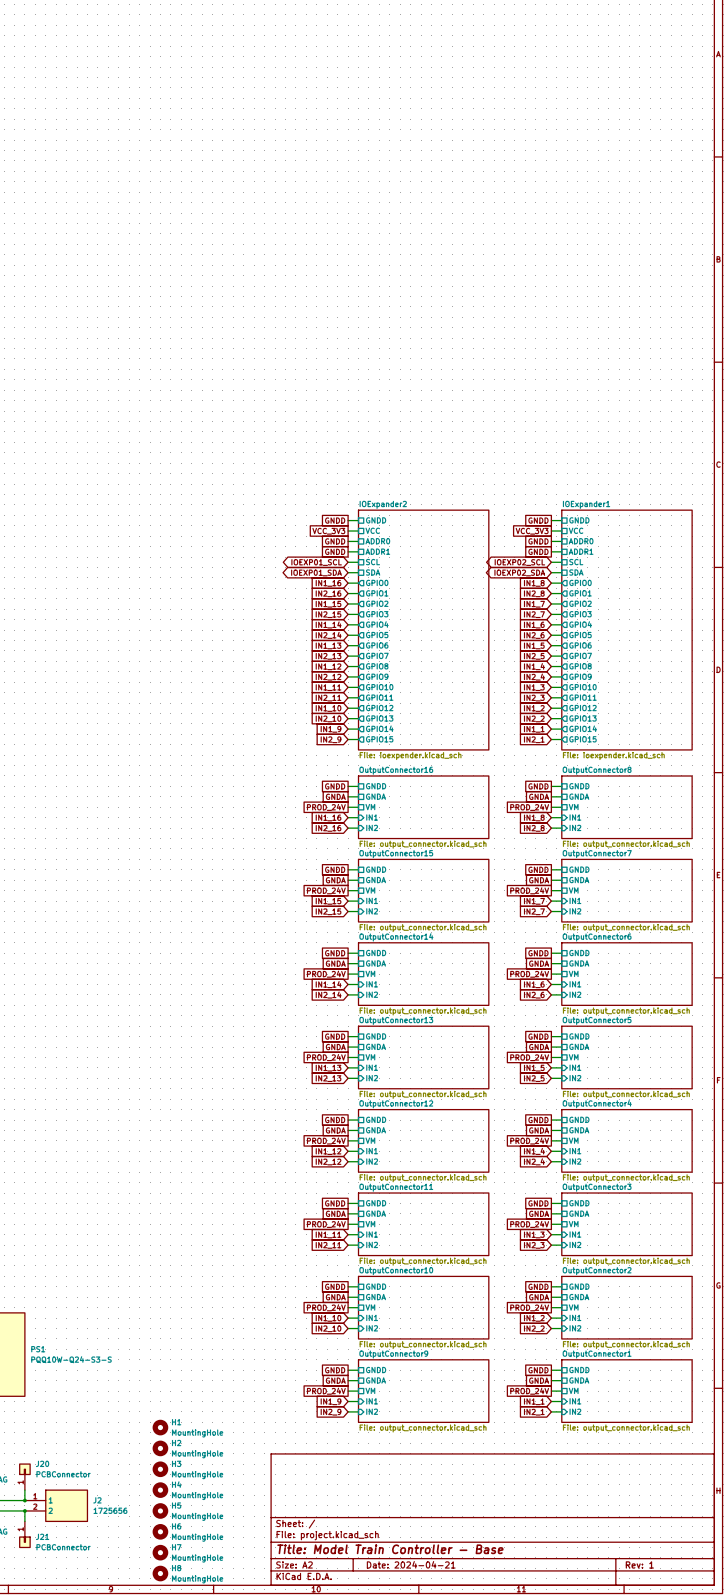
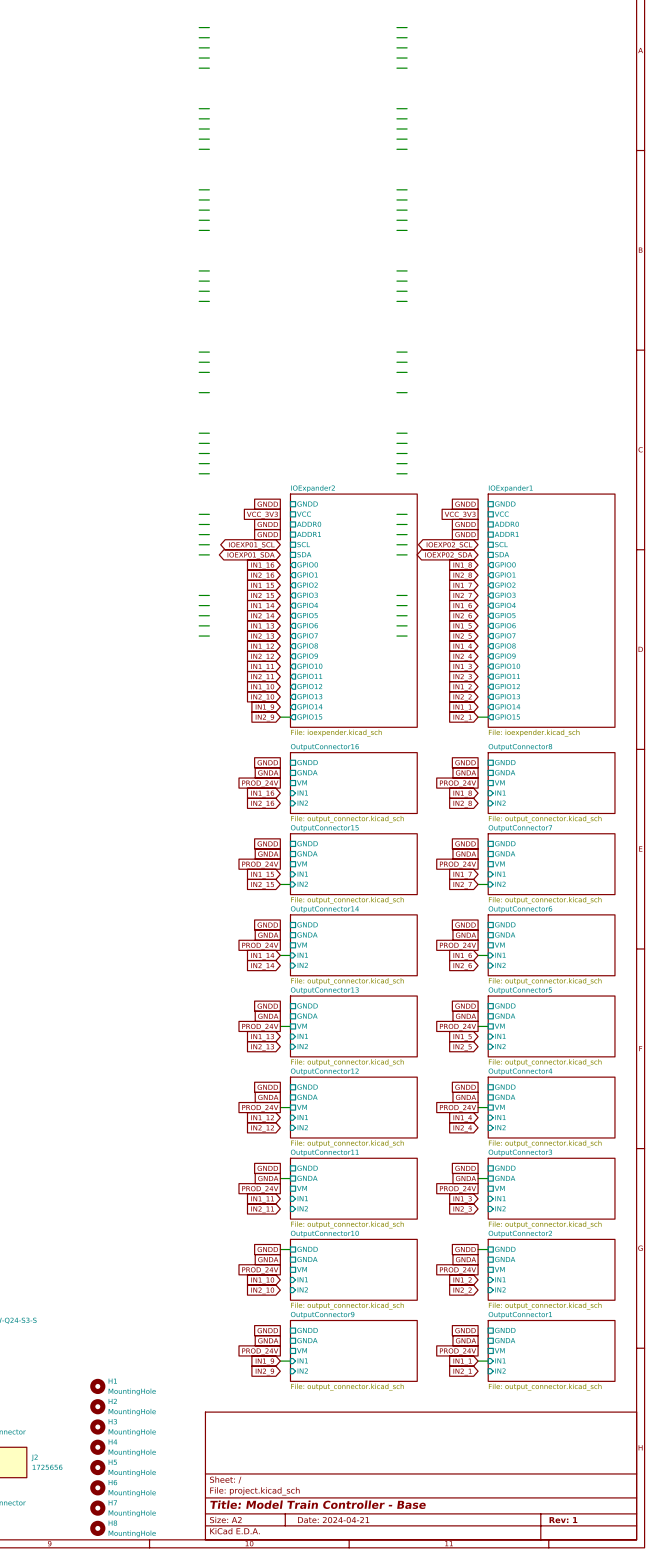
wire: none -> (199, 27) (209, 27)
wire: none -> (396, 27) (407, 27)
wire: none -> (199, 37) (209, 37)
wire: none -> (396, 37) (407, 37)
wire: none -> (199, 47) (209, 47)
wire: none -> (396, 47) (407, 47)
wire: none -> (199, 58) (209, 58)
wire: none -> (396, 58) (407, 58)
wire: none -> (199, 68) (209, 68)
wire: none -> (396, 68) (407, 68)
wire: none -> (199, 108) (209, 108)
wire: none -> (396, 108) (407, 108)
wire: none -> (199, 118) (209, 118)
wire: none -> (396, 118) (407, 118)
wire: none -> (199, 129) (209, 129)
wire: none -> (396, 129) (407, 129)
wire: none -> (199, 139) (209, 139)
wire: none -> (396, 139) (407, 139)
wire: none -> (199, 149) (209, 149)
wire: none -> (396, 149) (407, 149)
wire: none -> (199, 189) (209, 189)
wire: none -> (396, 189) (407, 189)
wire: none -> (199, 199) (209, 199)
wire: none -> (396, 199) (407, 199)
wire: none -> (199, 210) (209, 210)
wire: none -> (396, 210) (407, 210)
wire: none -> (199, 220) (209, 220)
wire: none -> (396, 220) (407, 220)
wire: none -> (199, 230) (209, 230)
wire: none -> (396, 230) (407, 230)
wire: none -> (199, 270) (209, 270)
wire: none -> (396, 270) (407, 270)
wire: none -> (199, 281) (209, 281)
wire: none -> (396, 281) (407, 281)
wire: none -> (199, 291) (209, 291)
wire: none -> (396, 291) (407, 291)
wire: none -> (199, 301) (209, 301)
wire: none -> (396, 301) (407, 301)
wire: none -> (199, 352) (209, 352)
wire: none -> (396, 352) (407, 352)
wire: none -> (199, 362) (209, 362)
wire: none -> (396, 362) (407, 362)
wire: none -> (199, 372) (209, 372)
wire: none -> (396, 372) (407, 372)
wire: none -> (199, 392) (209, 392)
wire: none -> (396, 392) (407, 392)
wire: none -> (199, 433) (209, 433)
wire: none -> (396, 433) (407, 433)
wire: none -> (199, 443) (209, 443)
wire: none -> (396, 443) (407, 443)
wire: (348, 520) (358, 520) -> (199, 453) (209, 453)
wire: (551, 520) (561, 520) -> (396, 453) (407, 453)
wire: (348, 531) (358, 531) -> (199, 463) (209, 463)
wire: (551, 531) (561, 531) -> (396, 463) (407, 463)
wire: (348, 541) (358, 541) -> (199, 473) (209, 473)
wire: (551, 541) (561, 541) -> (396, 473) (407, 473)
wire: (348, 551) (358, 551) -> none
wire: (551, 551) (561, 551) -> none
wire: (348, 562) (358, 562) -> none
wire: (551, 562) (561, 562) -> none
wire: (348, 572) (358, 572) -> none
wire: (551, 572) (561, 572) -> none
wire: (348, 583) (358, 583) -> (199, 514) (209, 514)
wire: (551, 583) (561, 583) -> (396, 514) (407, 514)
wire: (348, 593) (358, 593) -> (199, 524) (209, 524)
wire: (551, 593) (561, 593) -> (396, 524) (407, 524)
wire: (348, 603) (358, 603) -> (199, 534) (209, 534)
wire: (551, 603) (561, 603) -> (396, 534) (407, 534)
wire: (348, 614) (358, 614) -> (199, 544) (209, 544)
wire: (551, 614) (561, 614) -> (396, 544) (407, 544)
wire: (348, 624) (358, 624) -> (199, 554) (209, 554)
wire: (551, 624) (561, 624) -> (396, 554) (407, 554)
wire: (348, 635) (358, 635) -> none
wire: (551, 635) (561, 635) -> none
wire: (348, 645) (358, 645) -> none
wire: (551, 645) (561, 645) -> none
wire: (348, 656) (358, 656) -> none
wire: (551, 656) (561, 656) -> none
wire: (348, 666) (358, 666) -> (199, 595) (209, 595)
wire: (551, 666) (561, 666) -> (396, 595) (407, 595)
wire: (348, 676) (358, 676) -> (199, 605) (209, 605)
wire: (551, 676) (561, 676) -> (396, 605) (407, 605)
wire: (348, 687) (358, 687) -> (199, 615) (209, 615)
wire: (551, 687) (561, 687) -> (396, 615) (407, 615)
wire: (348, 697) (358, 697) -> (199, 625) (209, 625)
wire: (551, 697) (561, 697) -> (396, 625) (407, 625)
wire: (348, 708) (358, 708) -> (199, 636) (209, 636)
wire: (551, 708) (561, 708) -> (396, 636) (407, 636)
wire: (348, 718) (358, 718) -> none
wire: (551, 718) (561, 718) -> none
wire: (348, 729) (358, 729) -> none
wire: (551, 729) (561, 729) -> none
wire: (348, 786) (358, 786) -> none
wire: (551, 786) (561, 786) -> none
wire: (348, 796) (358, 796) -> none
wire: (551, 796) (561, 796) -> none
wire: (348, 807) (358, 807) -> none
wire: (551, 807) (561, 807) -> none
wire: (348, 817) (358, 817) -> none
wire: (551, 817) (561, 817) -> none
wire: (348, 828) (358, 828) -> none
wire: (551, 828) (561, 828) -> none
wire: (348, 869) (358, 869) -> none
wire: (551, 869) (561, 869) -> none
wire: (348, 880) (358, 880) -> none
wire: (551, 880) (561, 880) -> none
wire: (348, 890) (358, 890) -> none
wire: (551, 890) (561, 890) -> none
wire: (348, 901) (358, 901) -> none
wire: (551, 901) (561, 901) -> none
wire: (348, 953) (358, 953) -> none
wire: (551, 953) (561, 953) -> none
wire: (348, 963) (358, 963) -> none
wire: (551, 963) (561, 963) -> none
wire: (348, 974) (358, 974) -> none
wire: (551, 974) (561, 974) -> none
wire: (348, 994) (358, 994) -> none
wire: (551, 994) (561, 994) -> none
wire: (348, 1036) (358, 1036) -> none
wire: (551, 1036) (561, 1036) -> none
wire: (348, 1047) (358, 1047) -> none
wire: (551, 1047) (561, 1047) -> none
wire: (348, 1067) (358, 1067) -> none
wire: (551, 1067) (561, 1067) -> none
wire: (348, 1078) (358, 1078) -> none
wire: (551, 1078) (561, 1078) -> none
wire: (348, 1120) (358, 1120) -> none
wire: (551, 1120) (561, 1120) -> none
wire: (348, 1130) (358, 1130) -> none
wire: (551, 1130) (561, 1130) -> none
wire: (348, 1151) (358, 1151) -> none
wire: (551, 1151) (561, 1151) -> none
wire: (348, 1161) (358, 1161) -> none
wire: (551, 1161) (561, 1161) -> none
wire: (348, 1203) (358, 1203) -> none
wire: (551, 1203) (561, 1203) -> none
wire: (348, 1224) (358, 1224) -> none
wire: (551, 1224) (561, 1224) -> none
wire: (348, 1234) (358, 1234) -> none
wire: (551, 1234) (561, 1234) -> none
wire: (348, 1245) (358, 1245) -> none
wire: (551, 1245) (561, 1245) -> none
wire: (348, 1297) (358, 1297) -> none
wire: (551, 1297) (561, 1297) -> none
wire: (348, 1307) (358, 1307) -> none
wire: (551, 1307) (561, 1307) -> none
wire: (348, 1318) (358, 1318) -> none
wire: (551, 1318) (561, 1318) -> none
wire: (348, 1328) (358, 1328) -> none
wire: (551, 1328) (561, 1328) -> none
wire: (348, 1370) (358, 1370) -> none
wire: (551, 1370) (561, 1370) -> none
wire: (348, 1380) (358, 1380) -> none
wire: (551, 1380) (561, 1380) -> none
wire: (348, 1391) (358, 1391) -> none
wire: (551, 1391) (561, 1391) -> none
wire: (348, 1411) (358, 1411) -> none
wire: (551, 1411) (561, 1411) -> none

